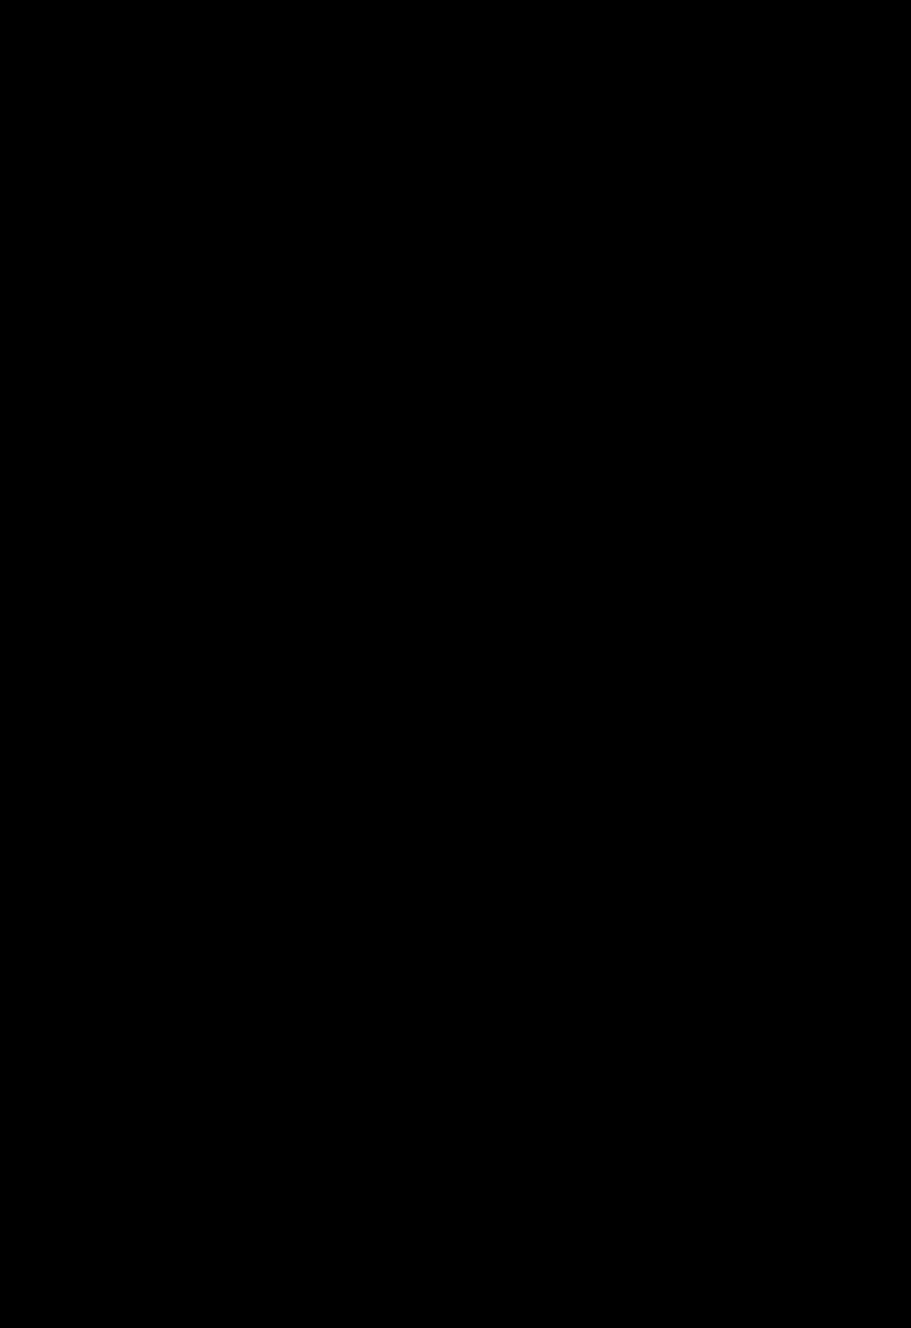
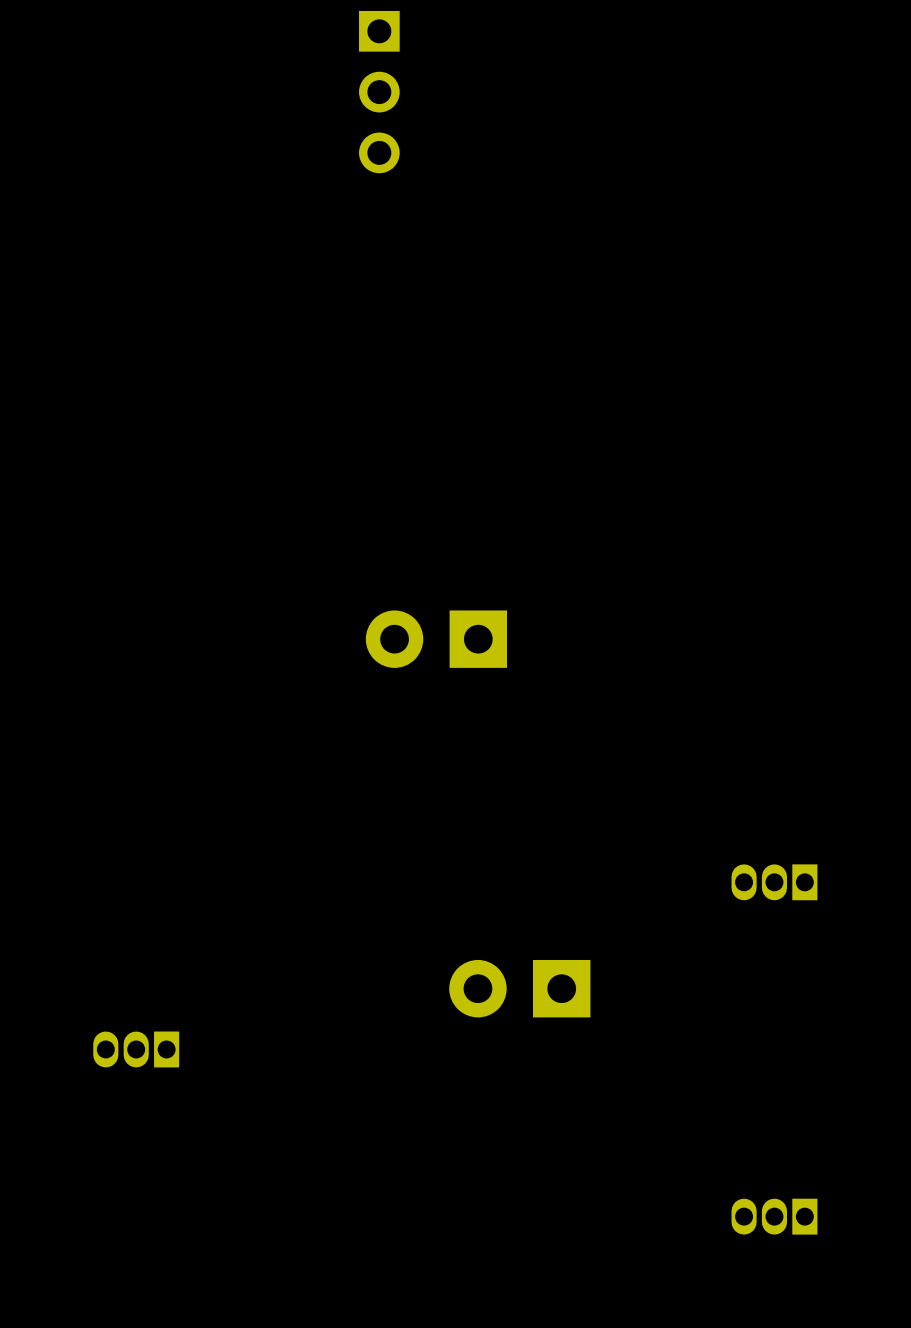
part: none -> (379, 92)
part: none -> (436, 639)
part: none -> (774, 882)
part: none -> (519, 988)
part: none -> (136, 1049)
part: none -> (774, 1216)

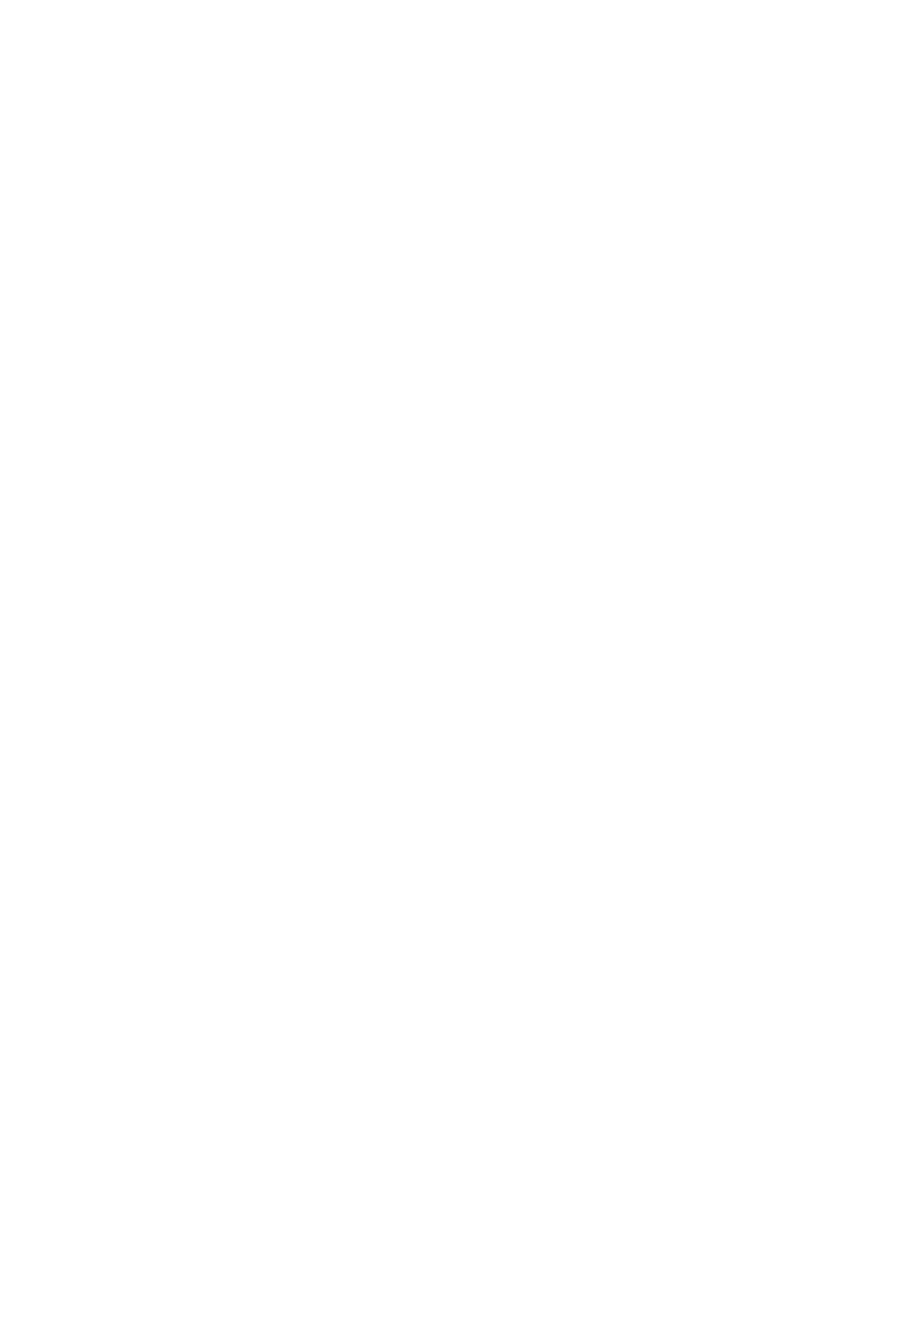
part: (379, 92) -> none
part: (436, 639) -> none
part: (774, 882) -> none
part: (519, 988) -> none
part: (136, 1049) -> none
part: (774, 1216) -> none

